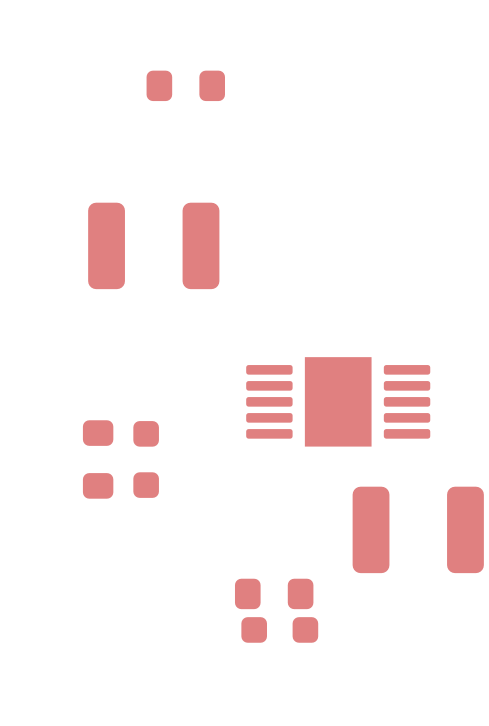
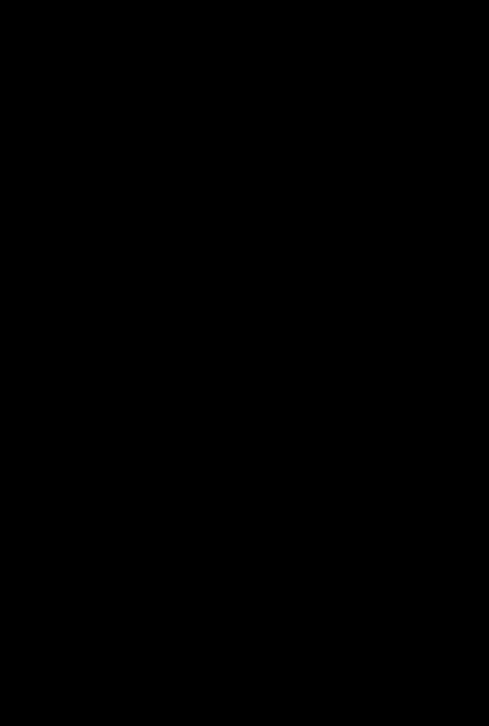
part: (185, 85) -> none
part: (153, 245) -> none
part: (338, 401) -> none
part: (98, 459) -> none
part: (146, 459) -> none
part: (418, 529) -> none
part: (274, 593) -> none
part: (279, 629) -> none

